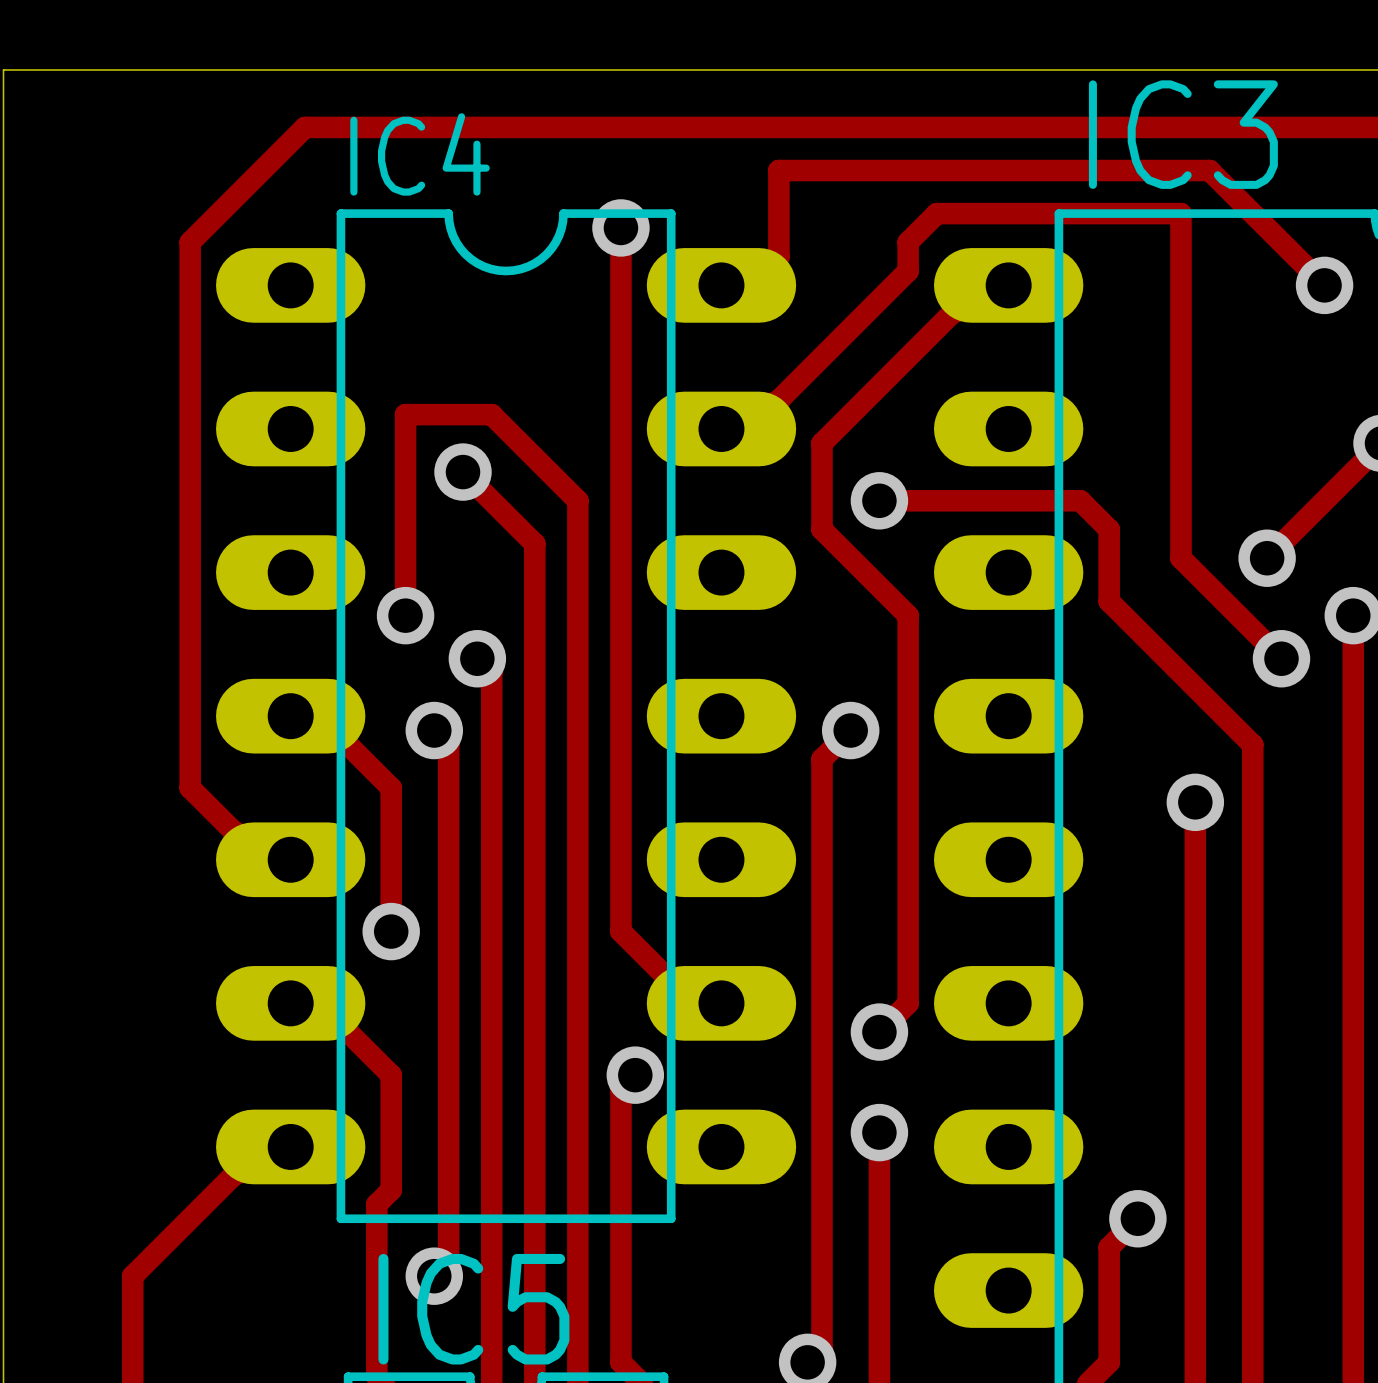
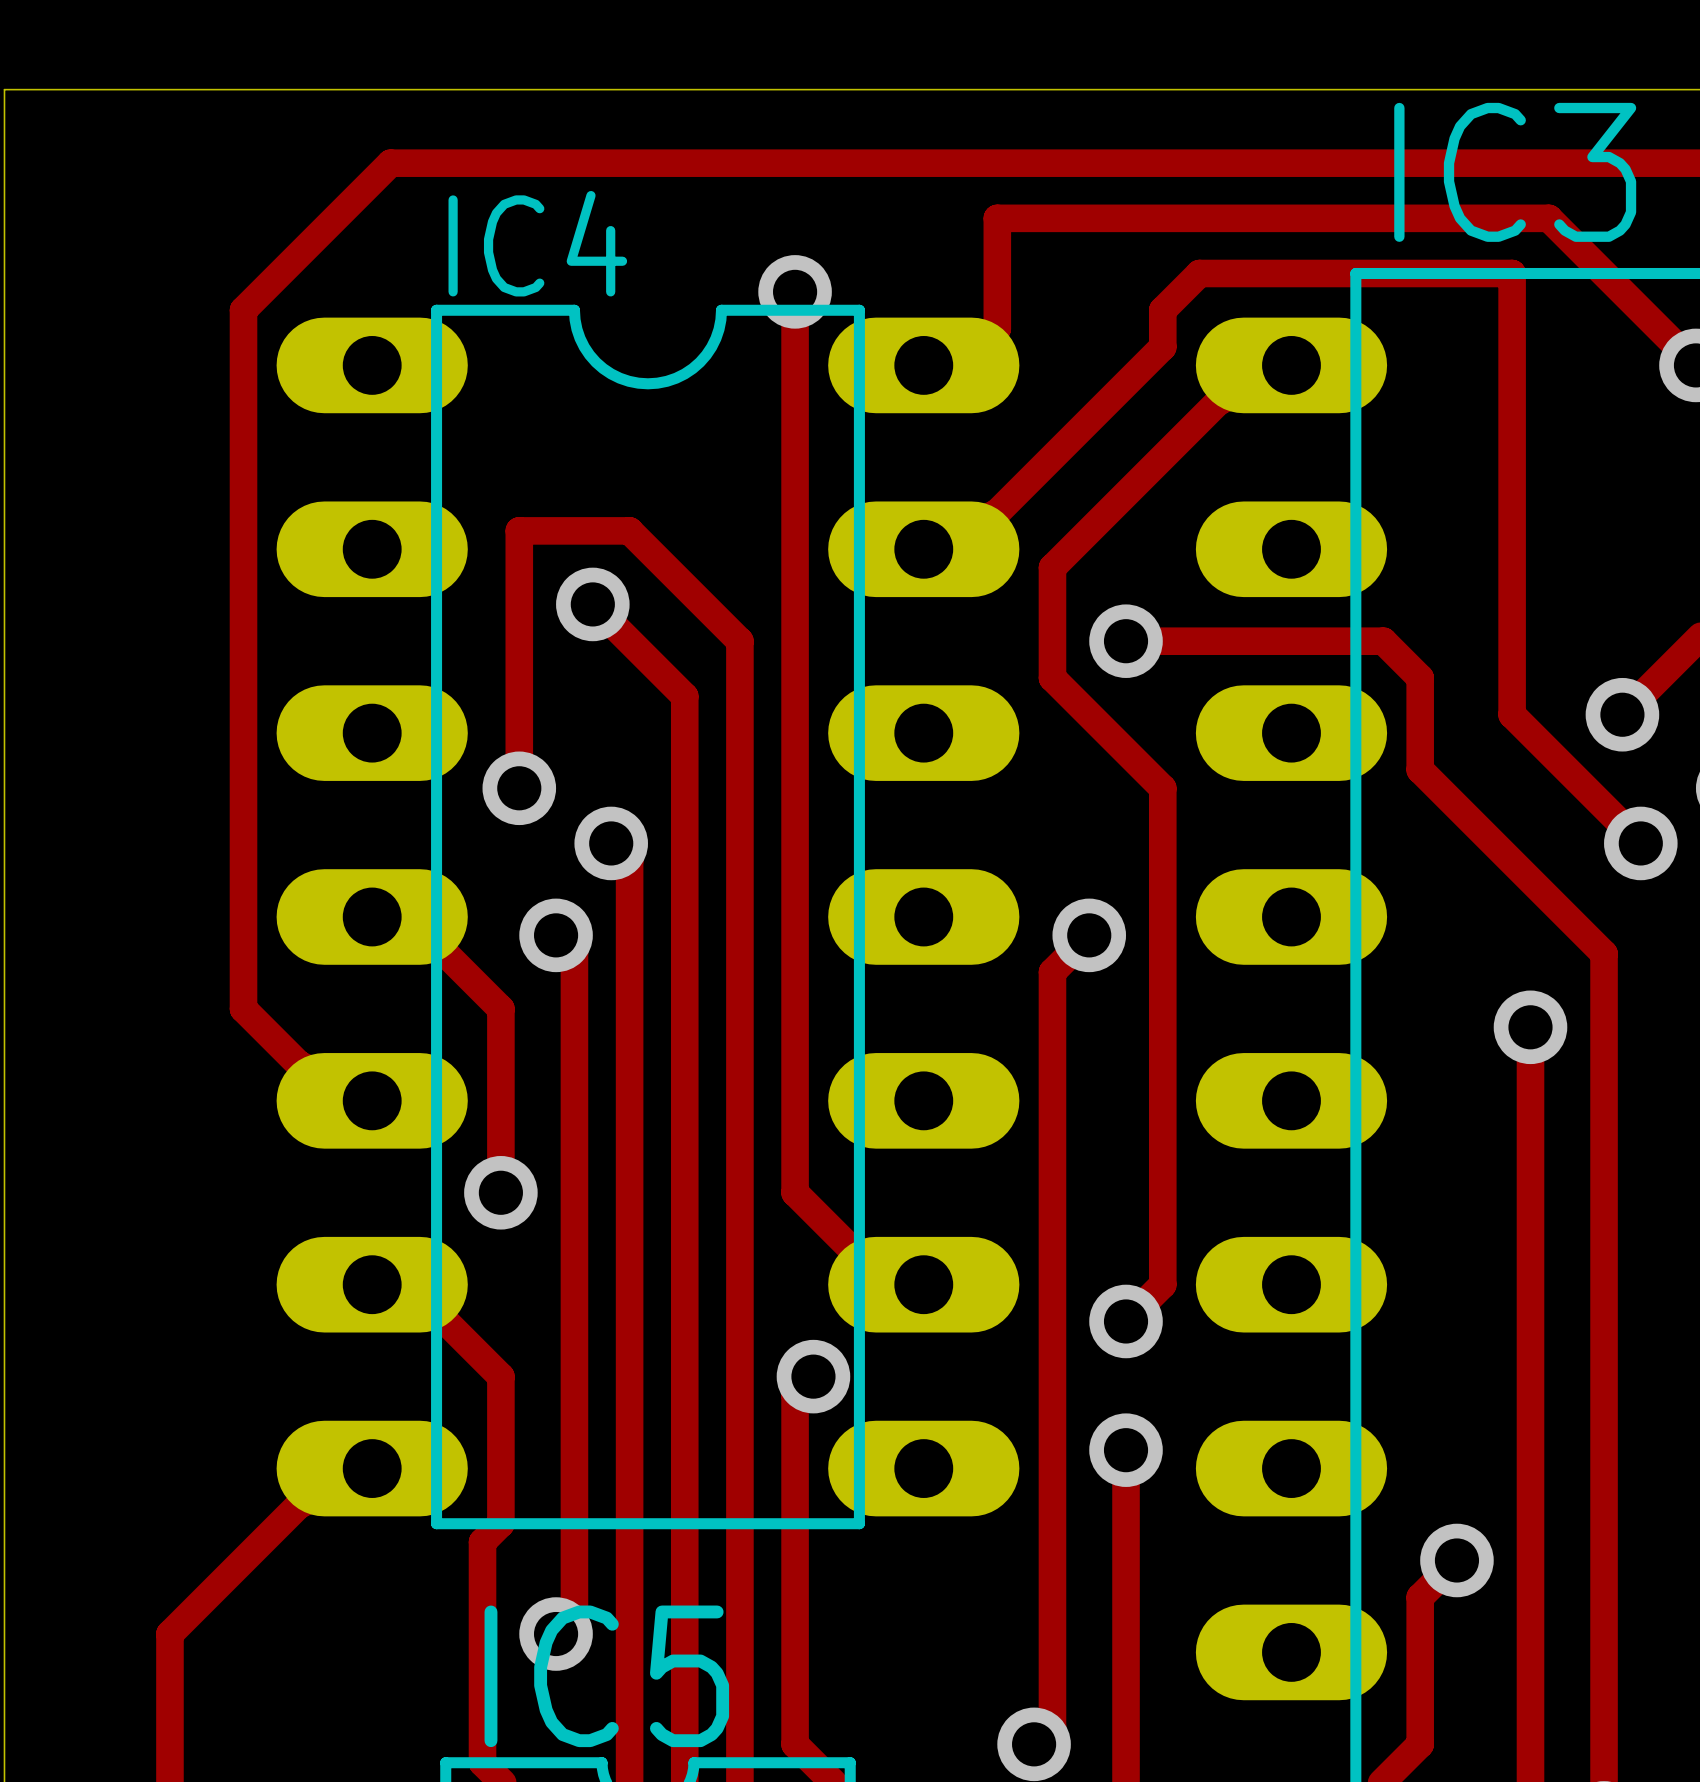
IC4 name position: IC4 (420, 154) -> IC4 (537, 243)
IC4 footprint: [216, 209, 797, 1224] -> [276, 304, 1020, 1530]

